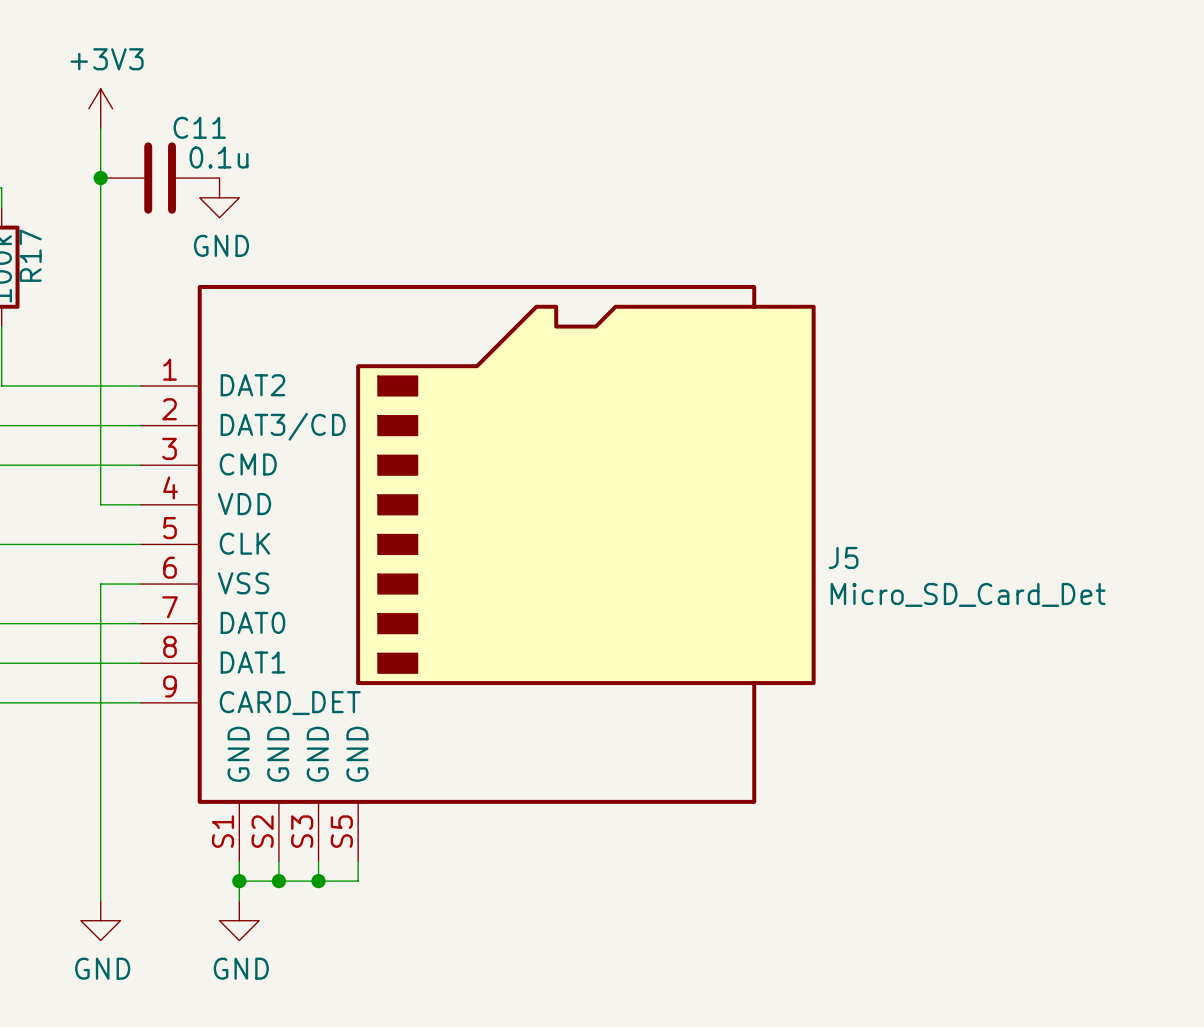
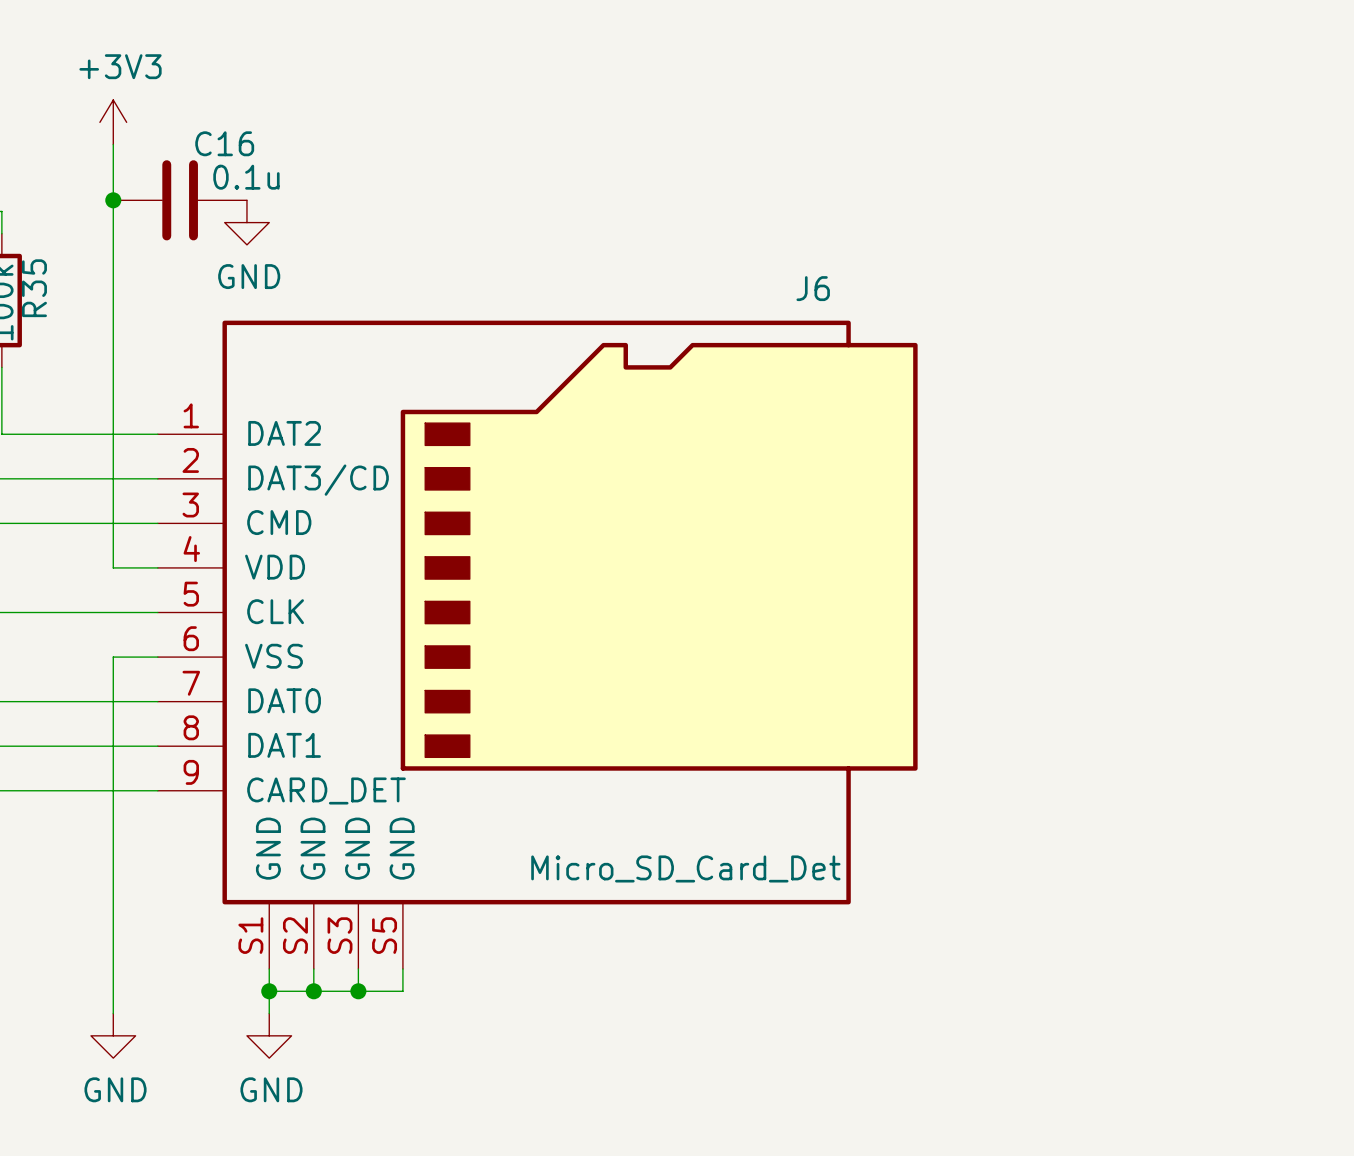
C11 name: C11 (199, 127) -> C16 (224, 143)
R17 name: R17 (30, 255) -> R35 (34, 288)
J5 name: J5 (843, 557) -> J6 (813, 288)
J5 value position: Micro_SD_Card_Det (968, 594) -> Micro_SD_Card_Det (685, 868)

